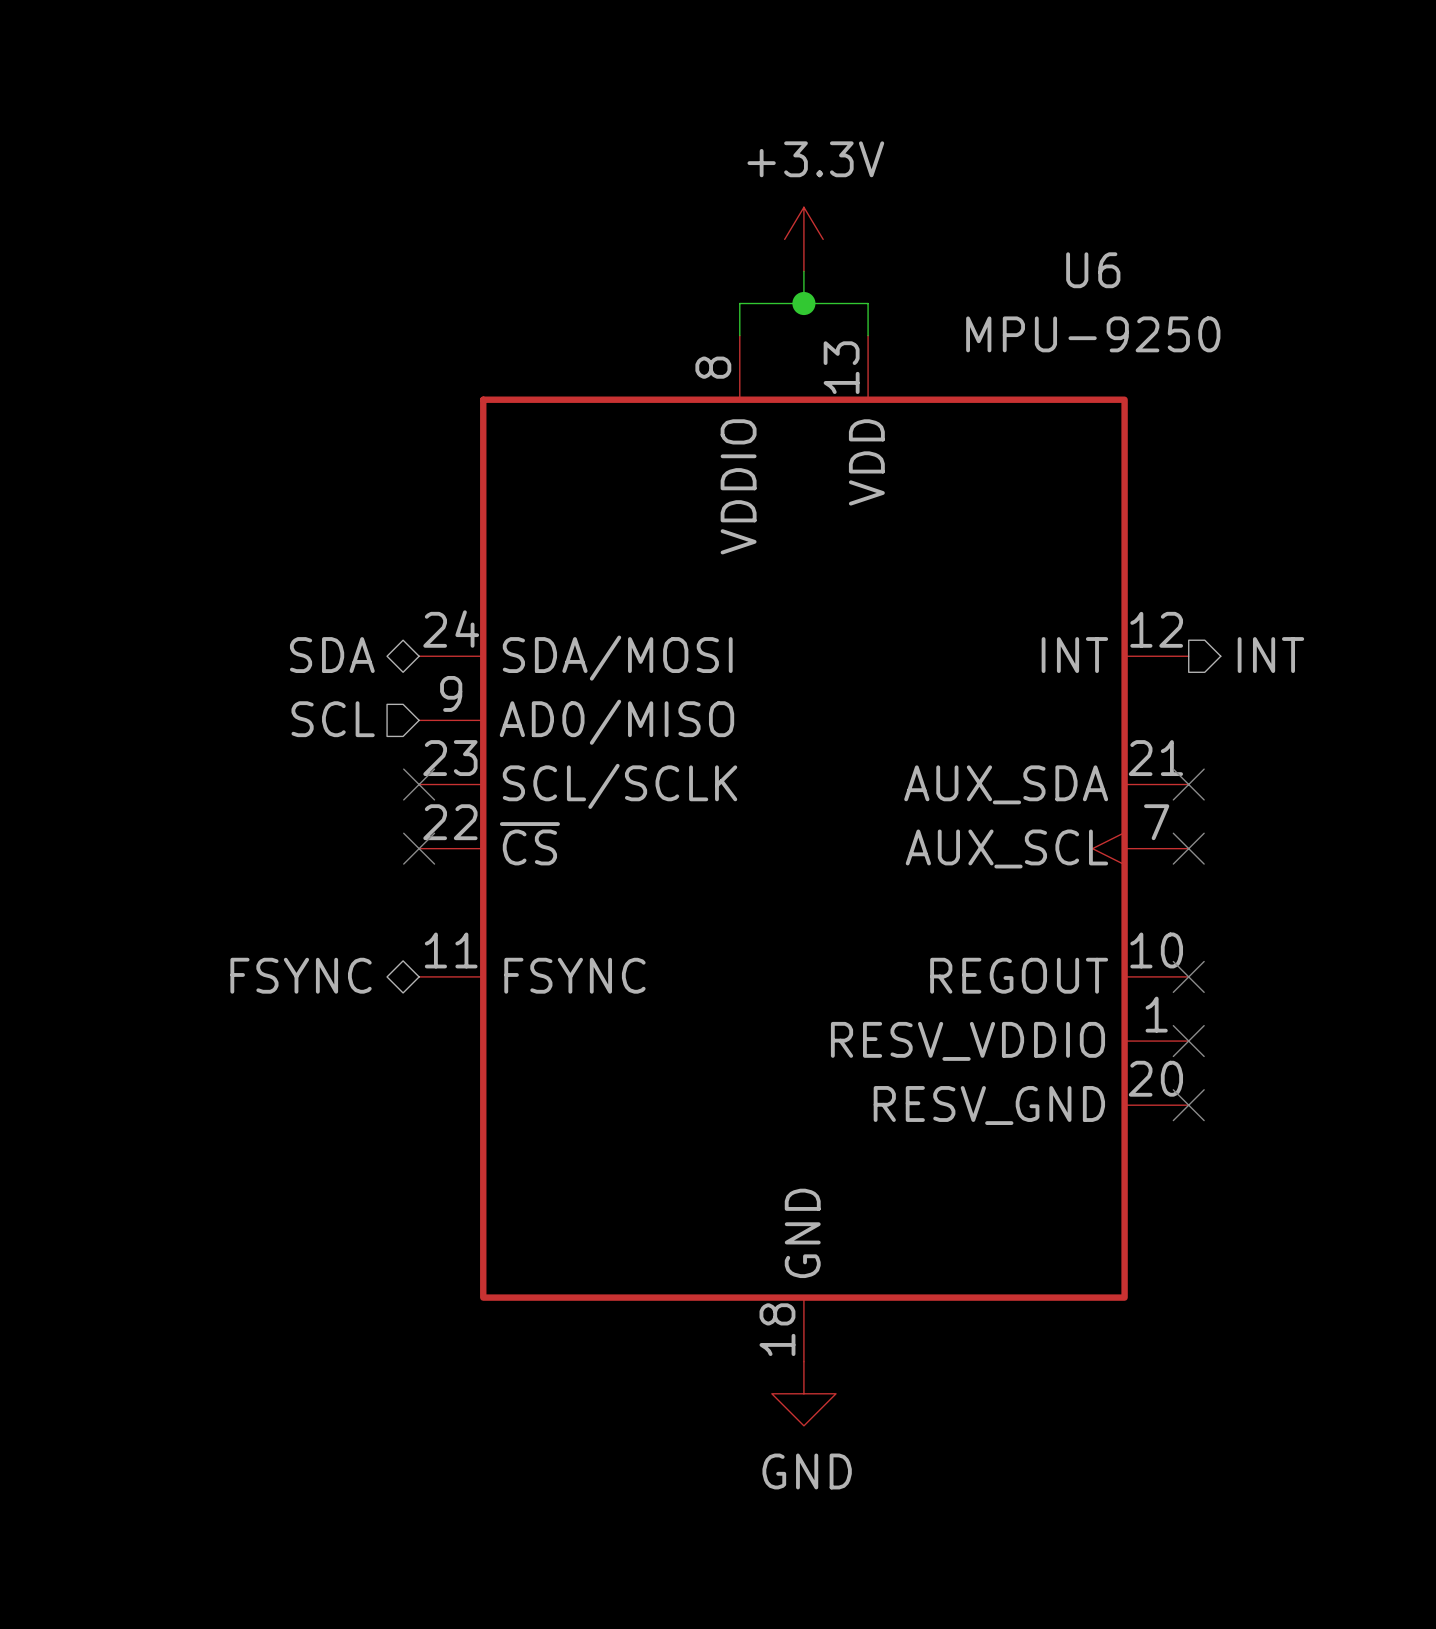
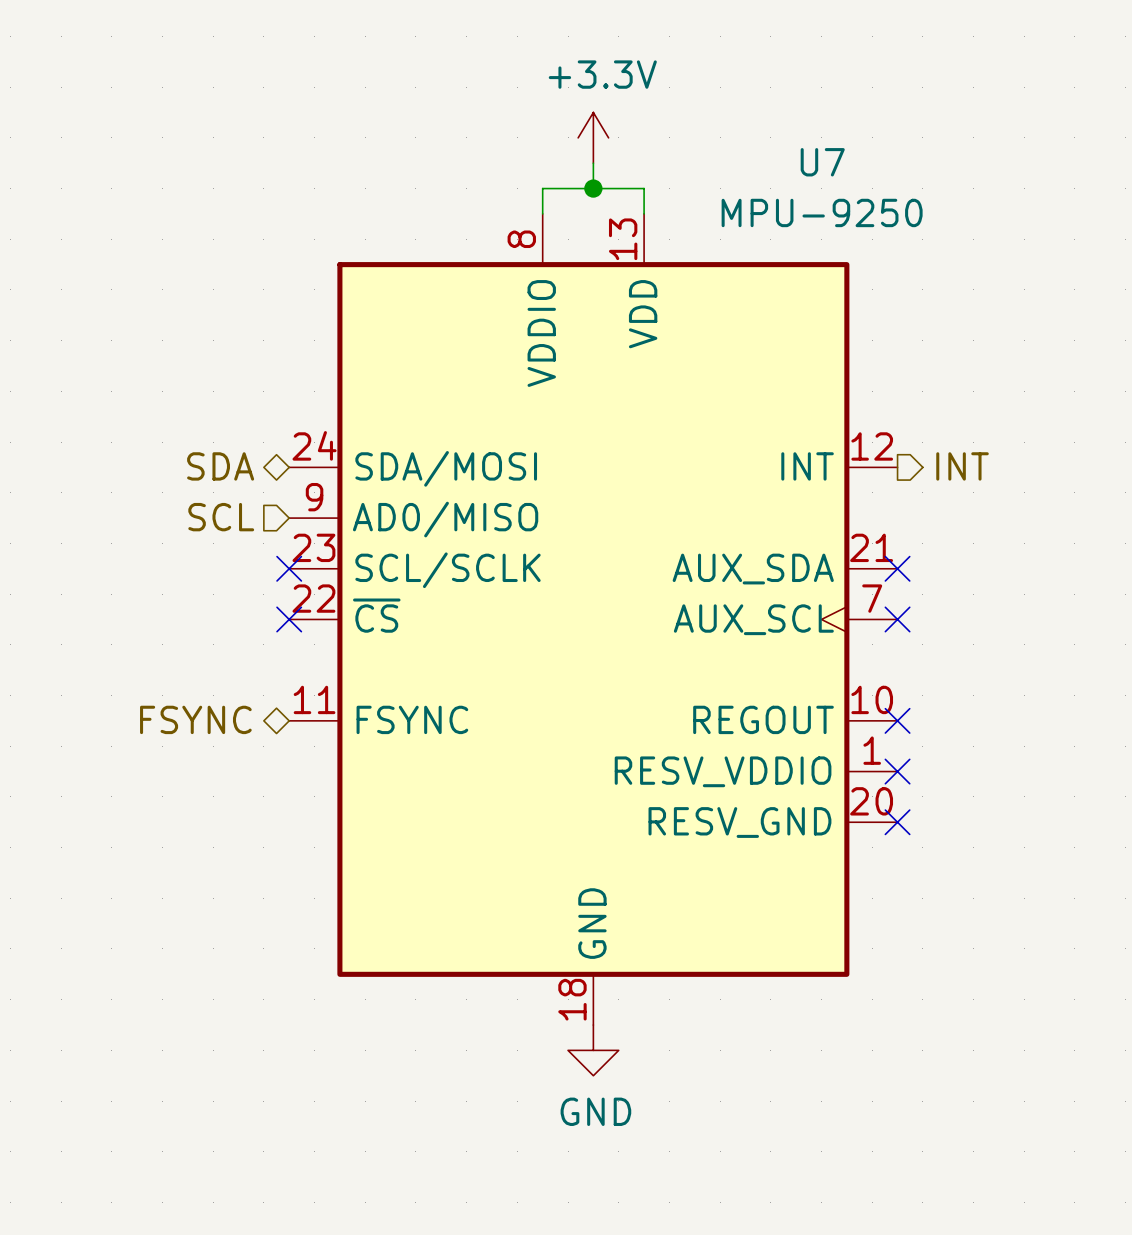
U6 name: U6 (1093, 270) -> U7 (822, 162)

